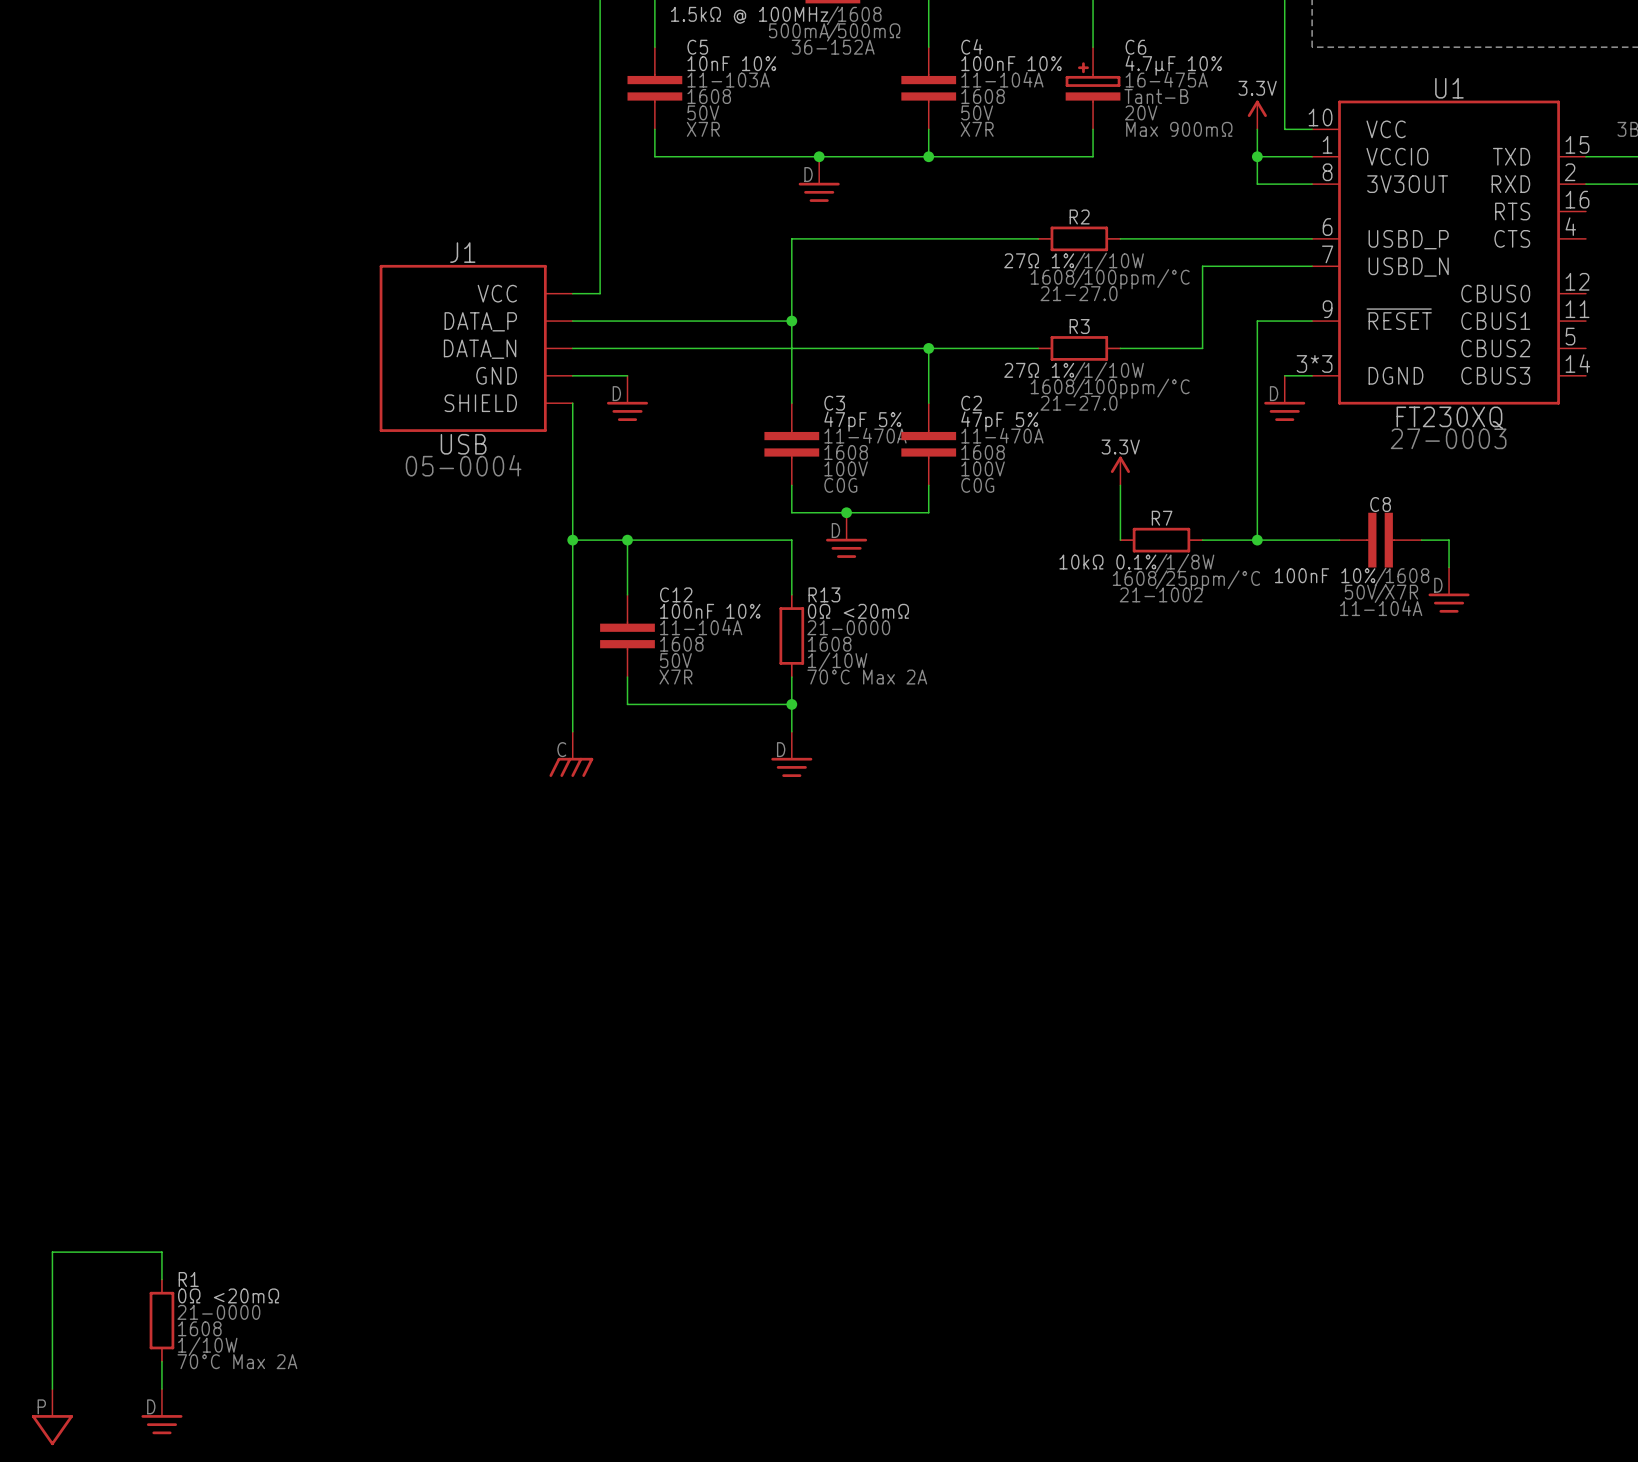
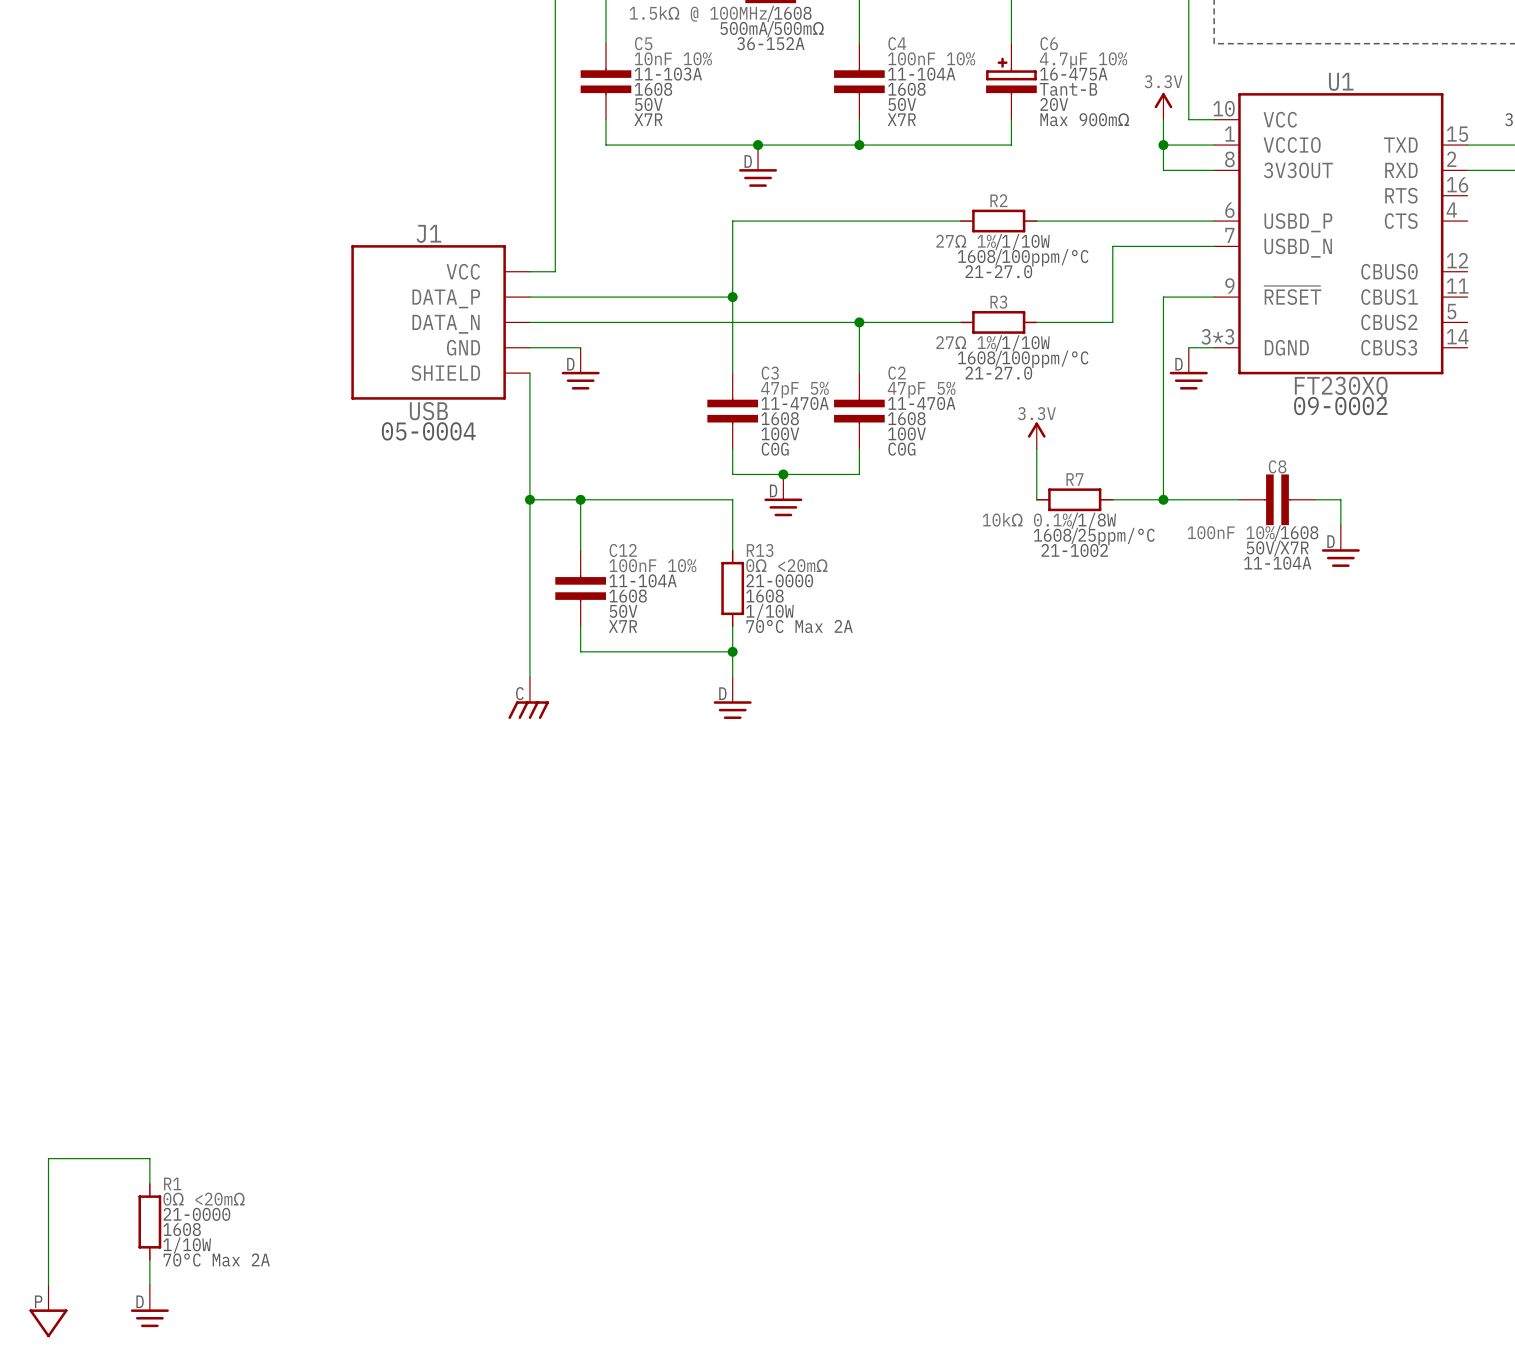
U1 text: 27-0003 (1448, 438) -> 09-0002 (1340, 406)

